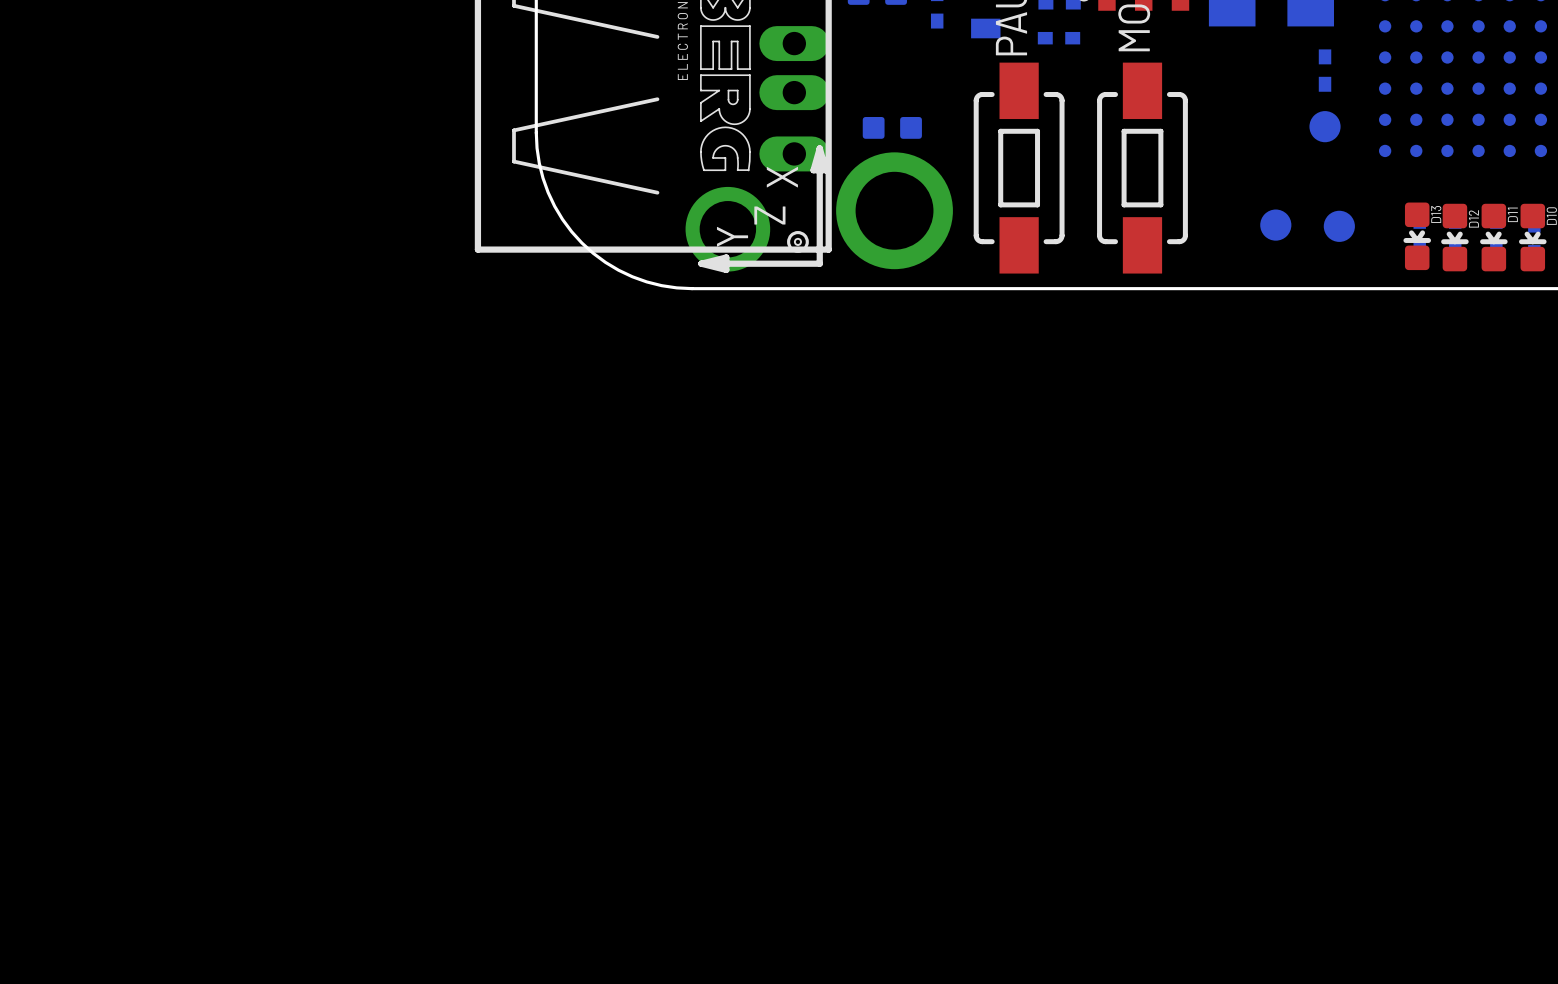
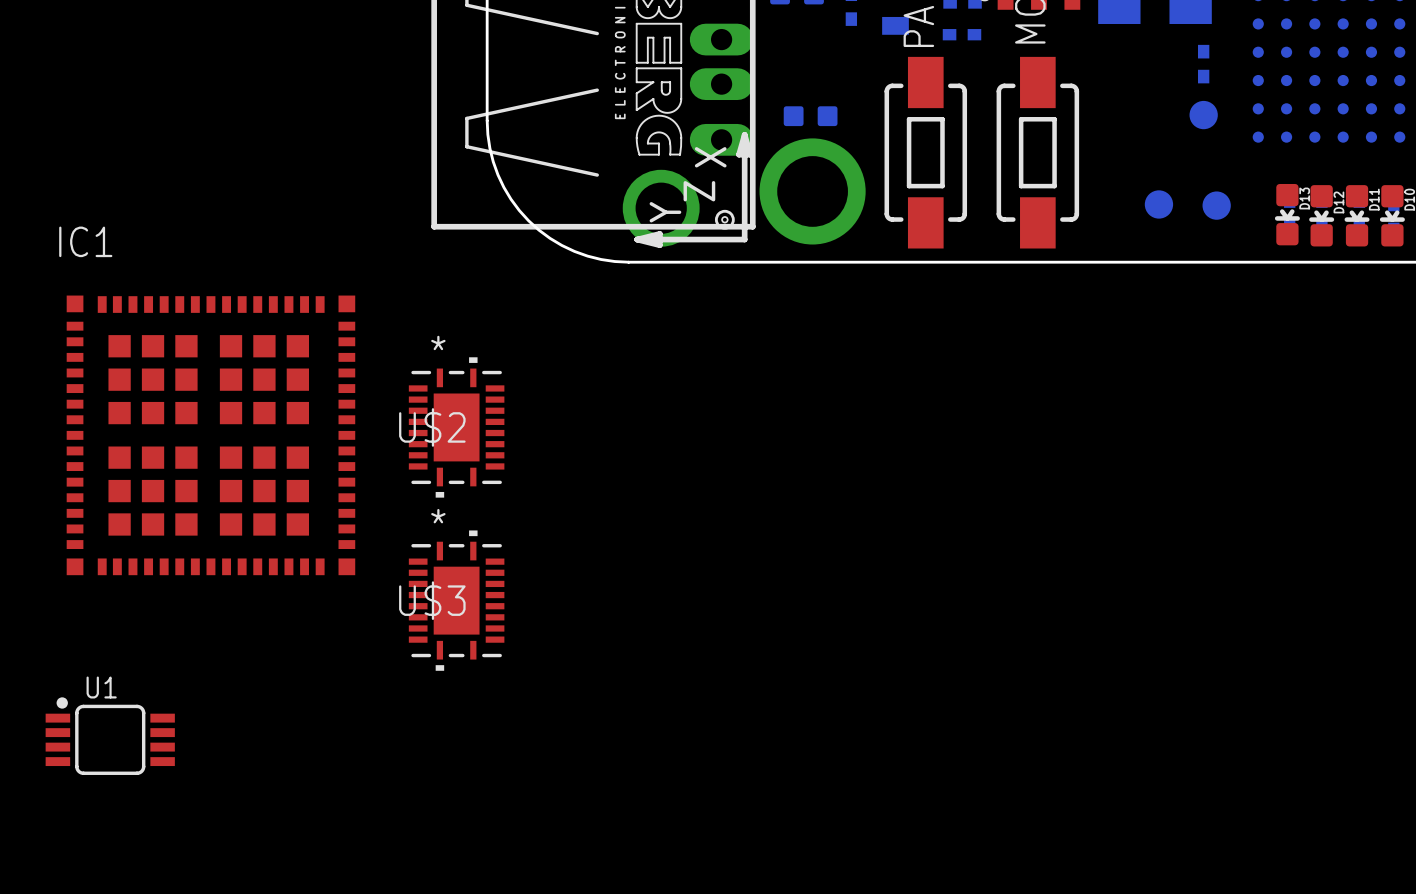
U$2: none -> (456, 427)
IC1: none -> (210, 435)
U$3: none -> (456, 600)
U1: none -> (110, 736)

